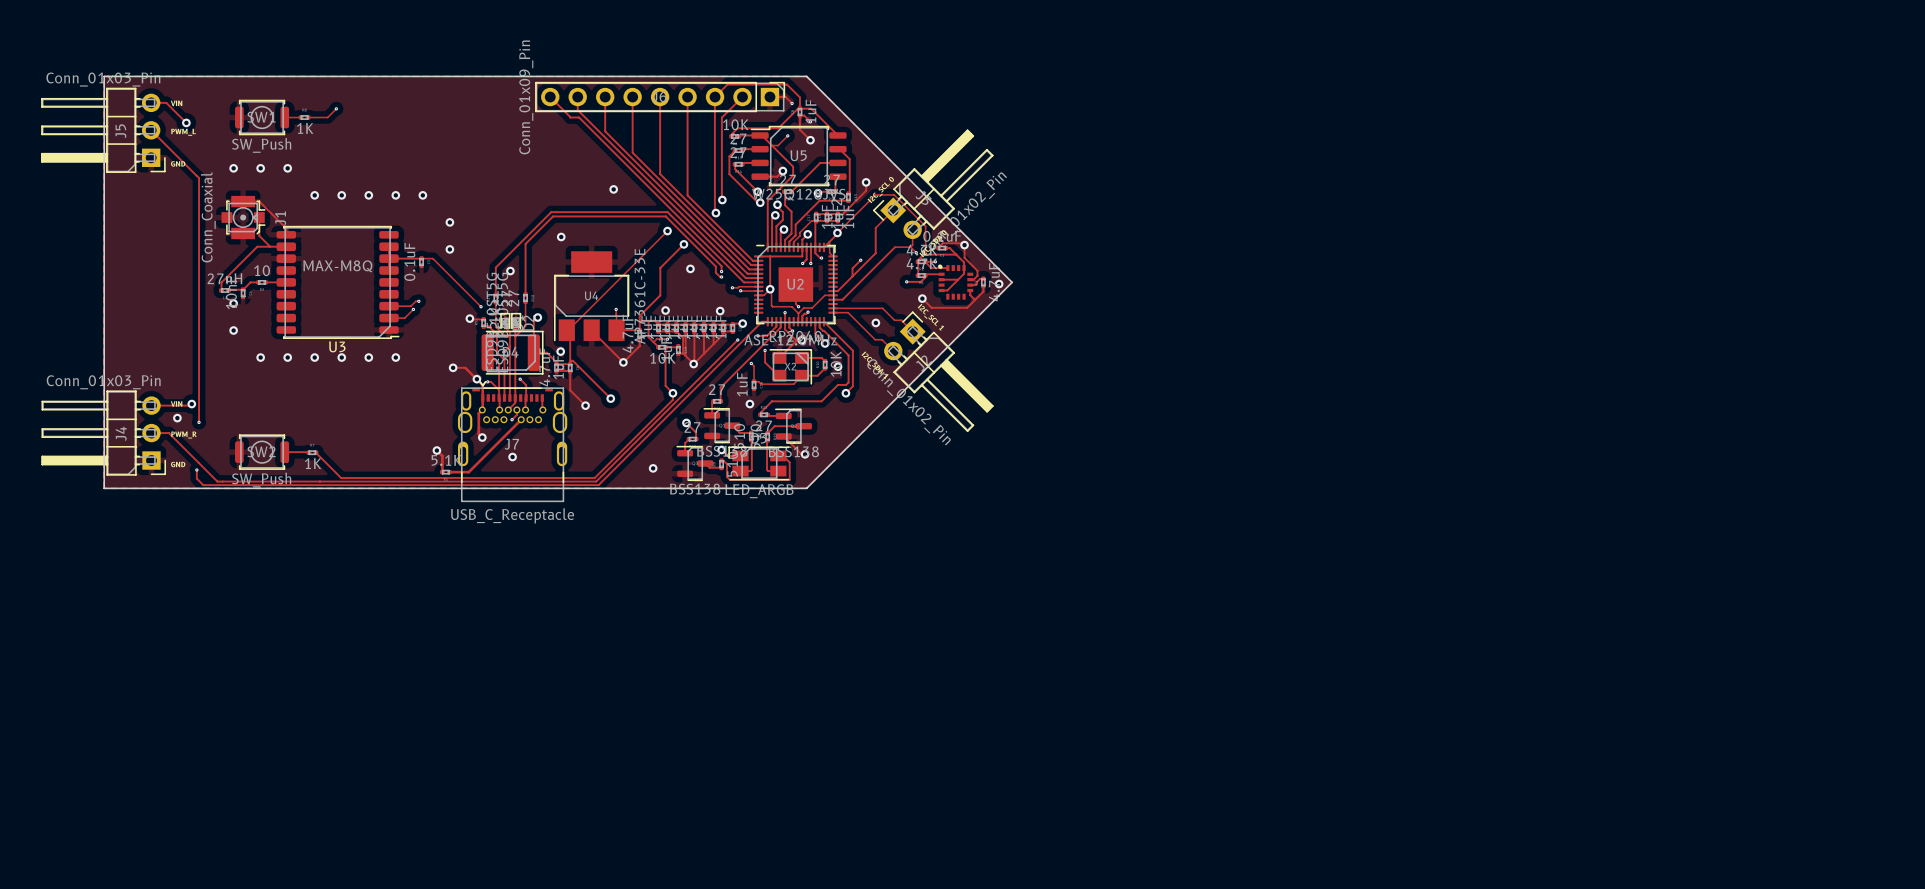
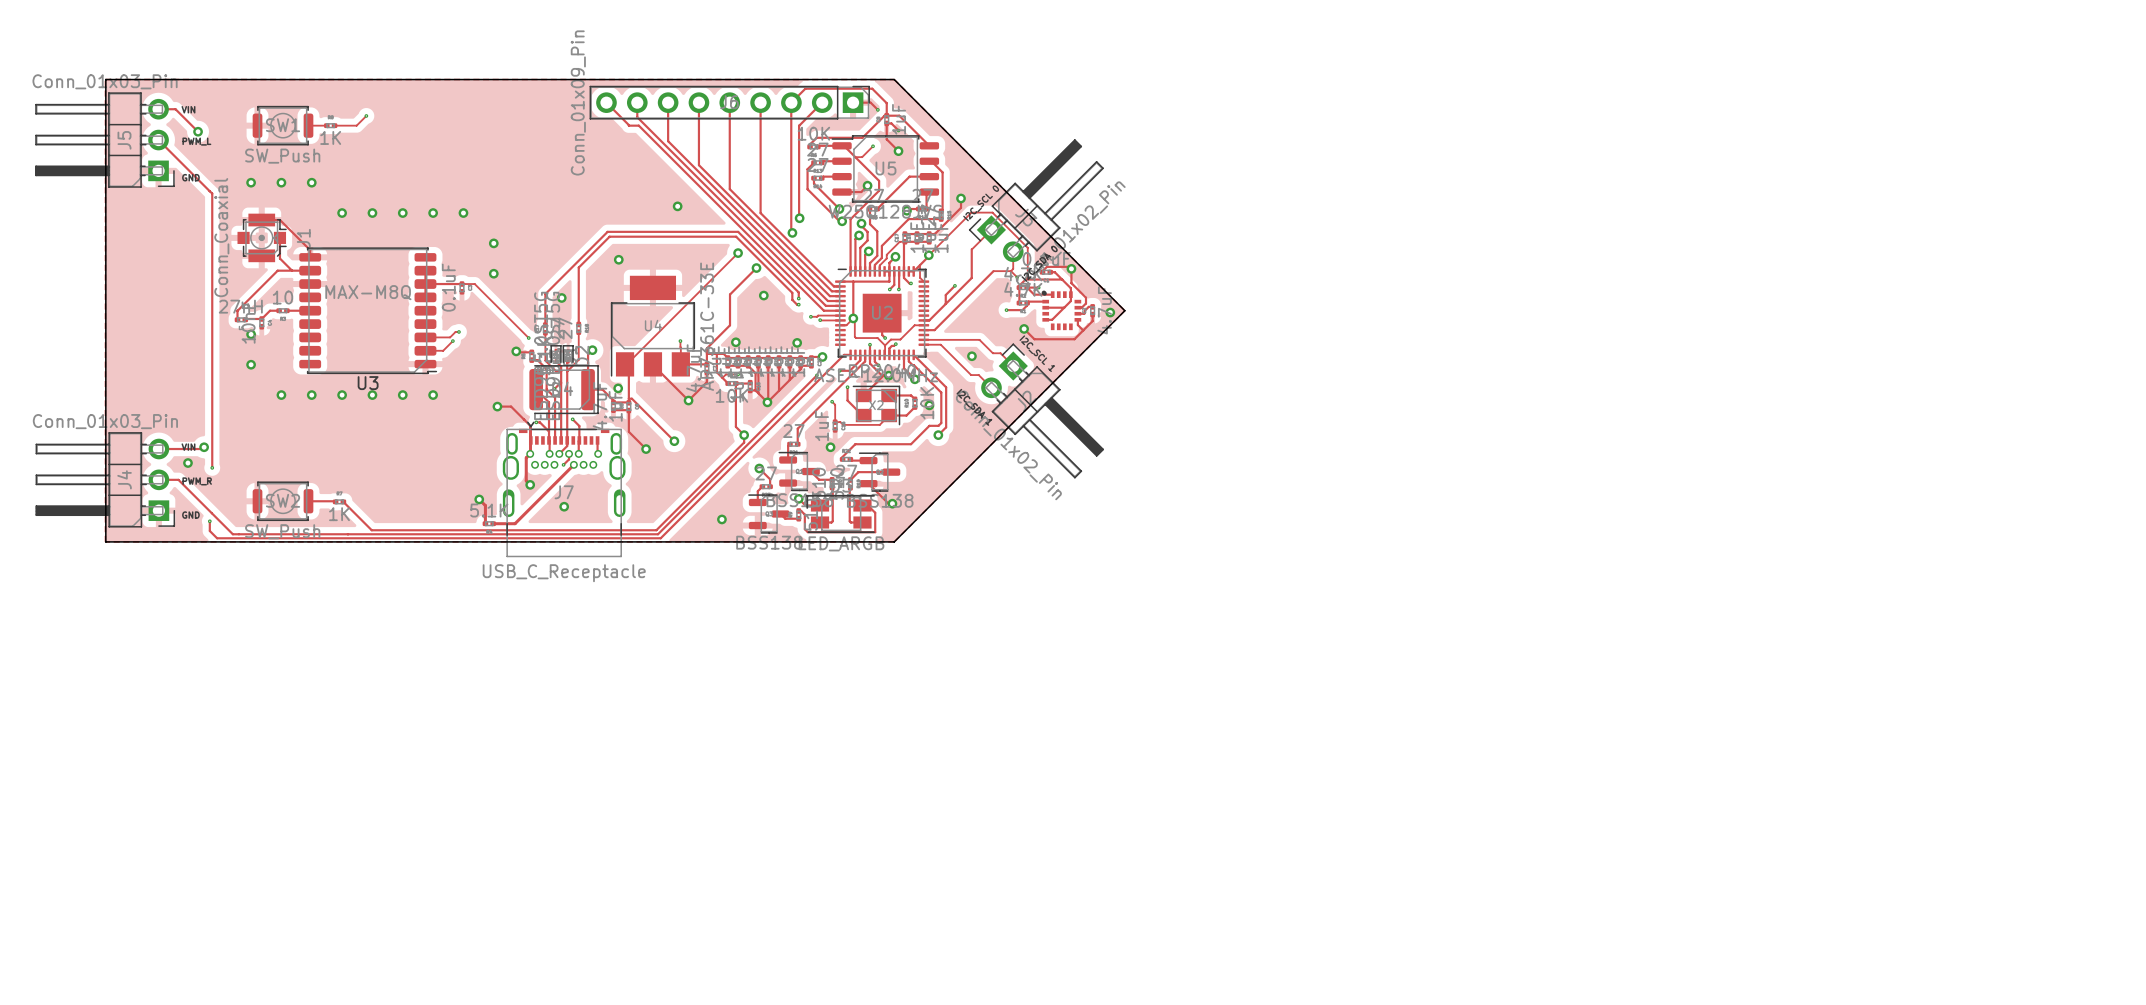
via: (476, 379) -> none

